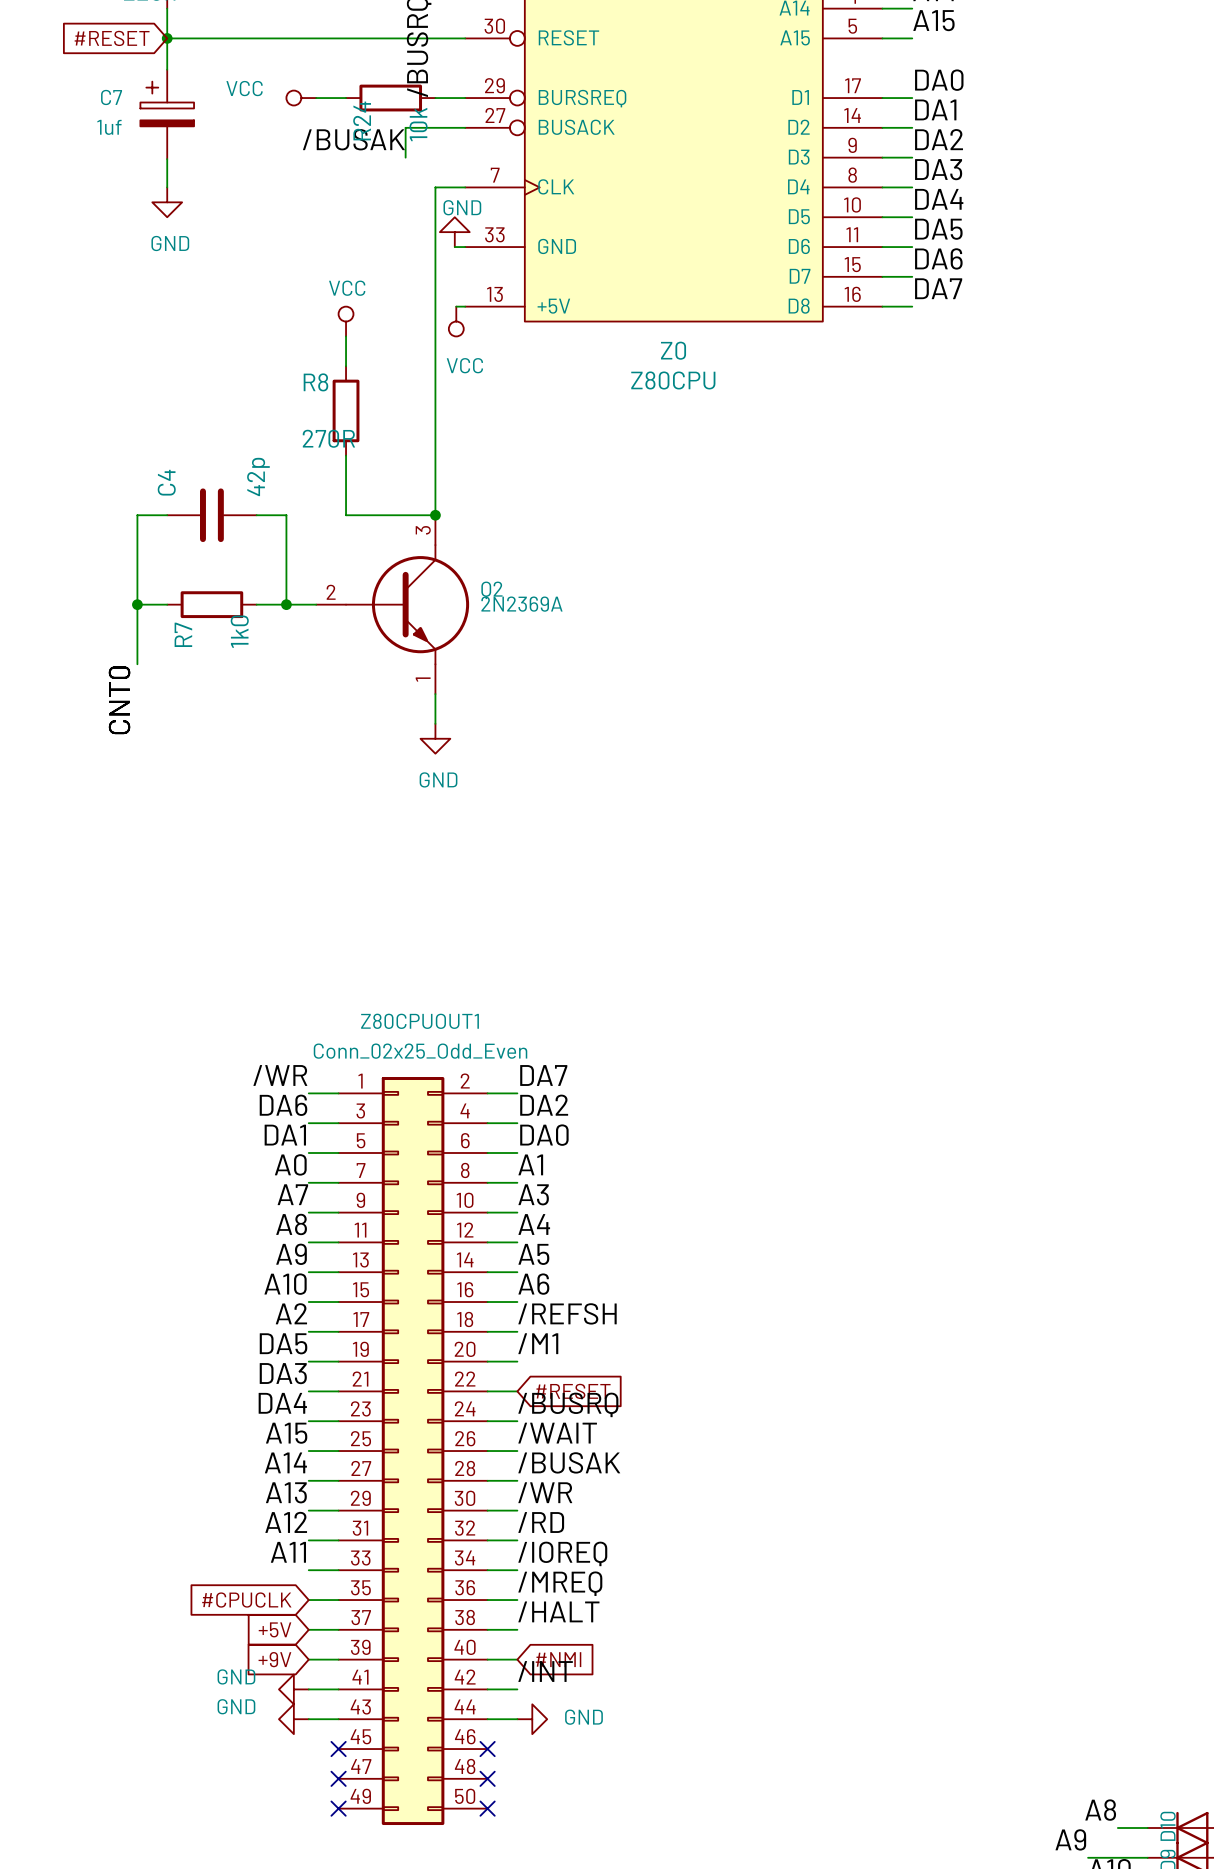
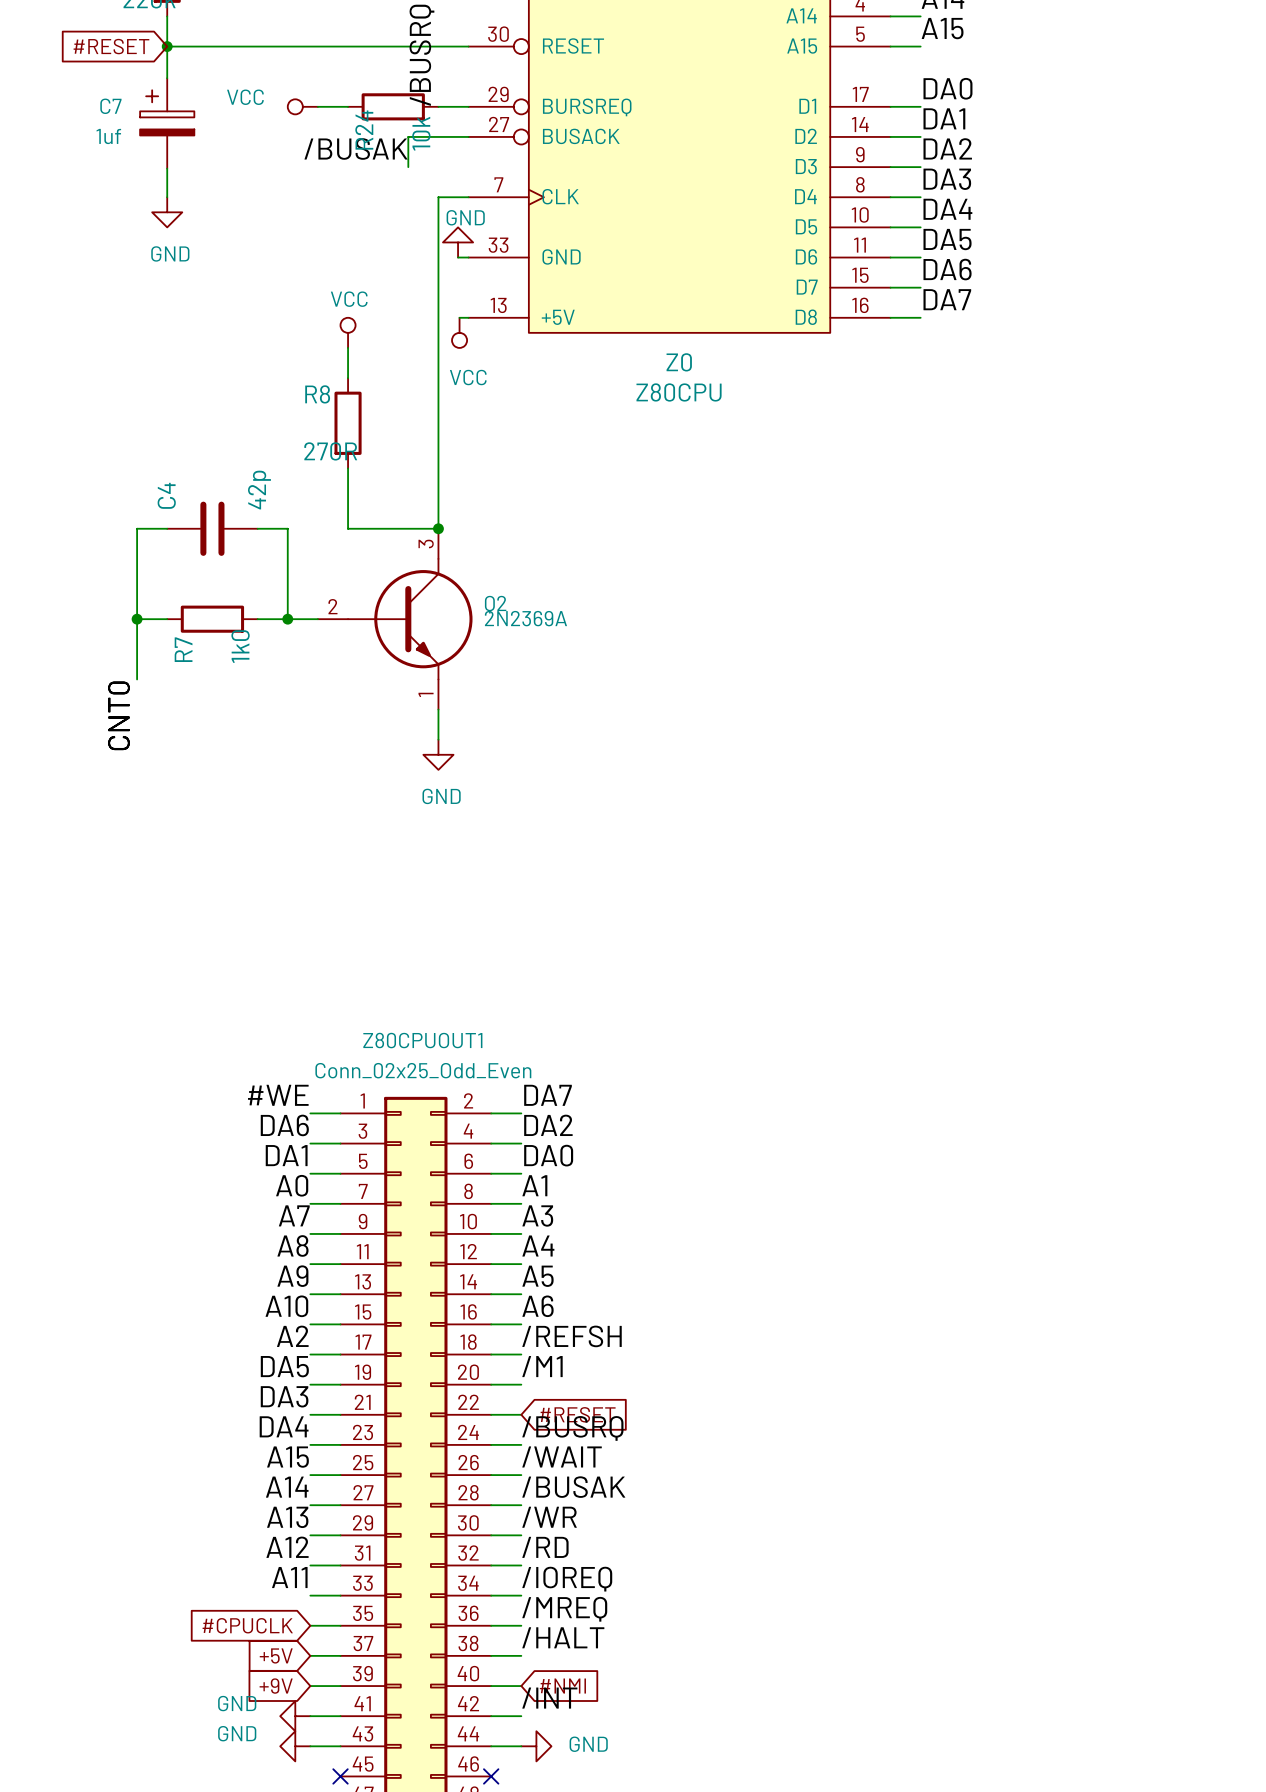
label: /WR (280, 1075) -> #WE (278, 1095)

